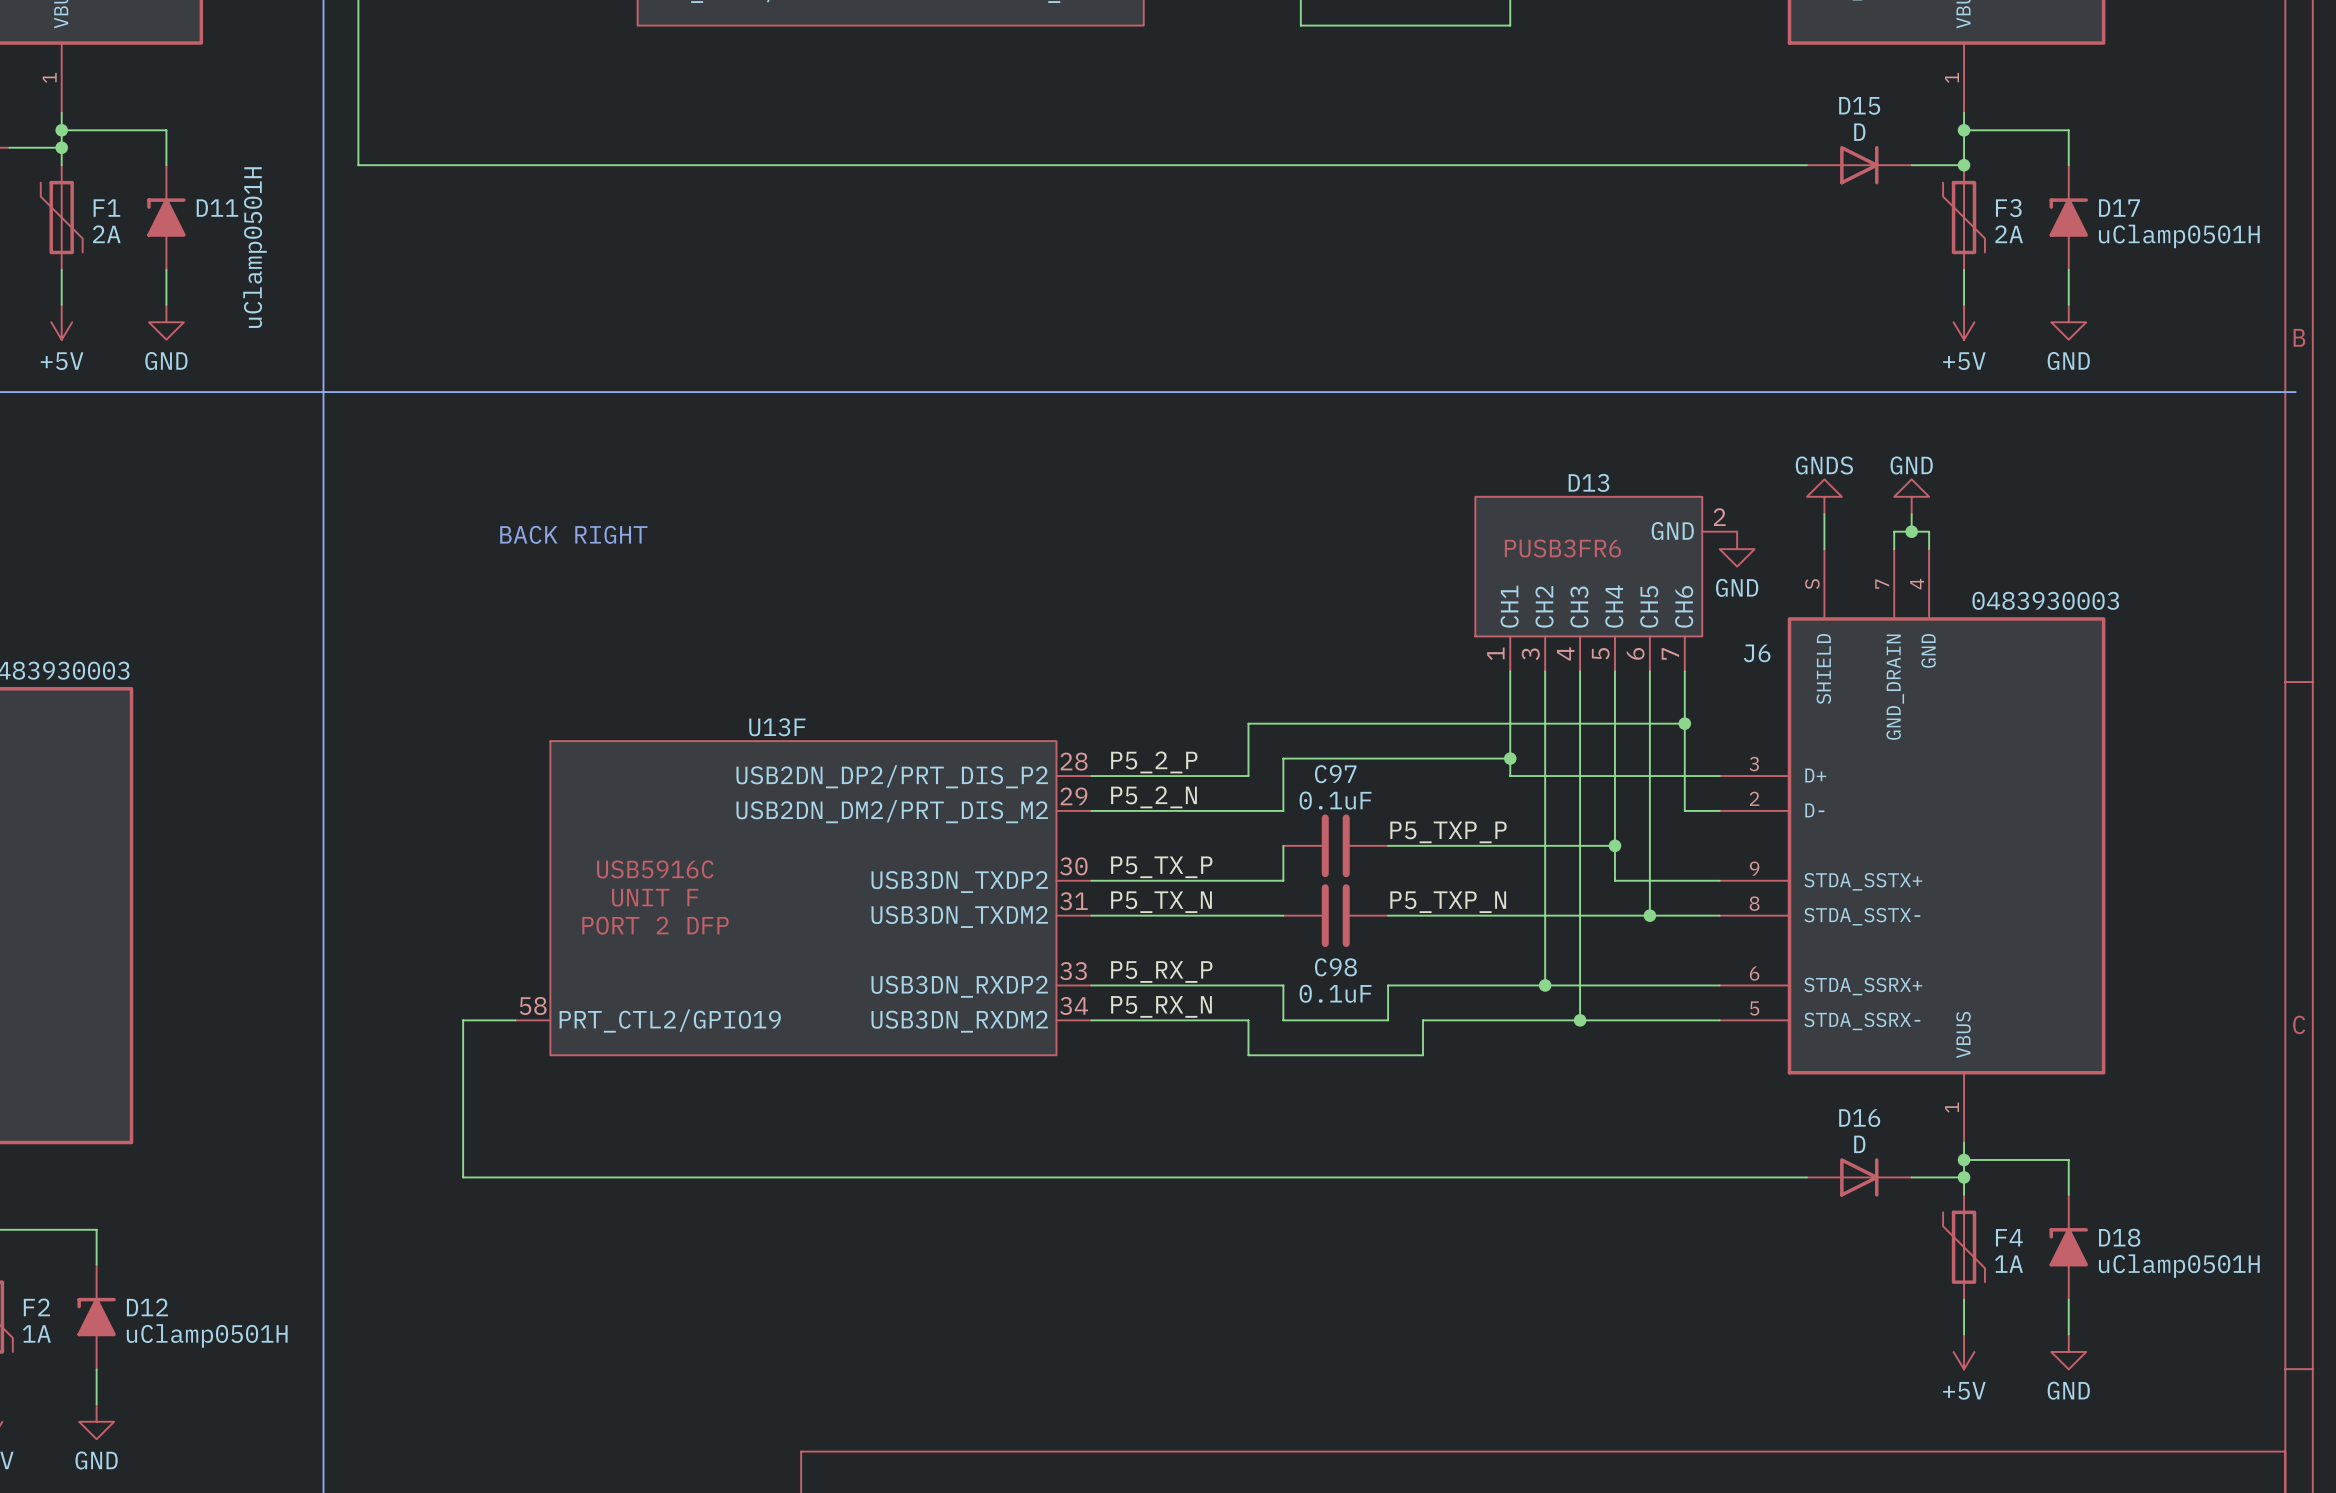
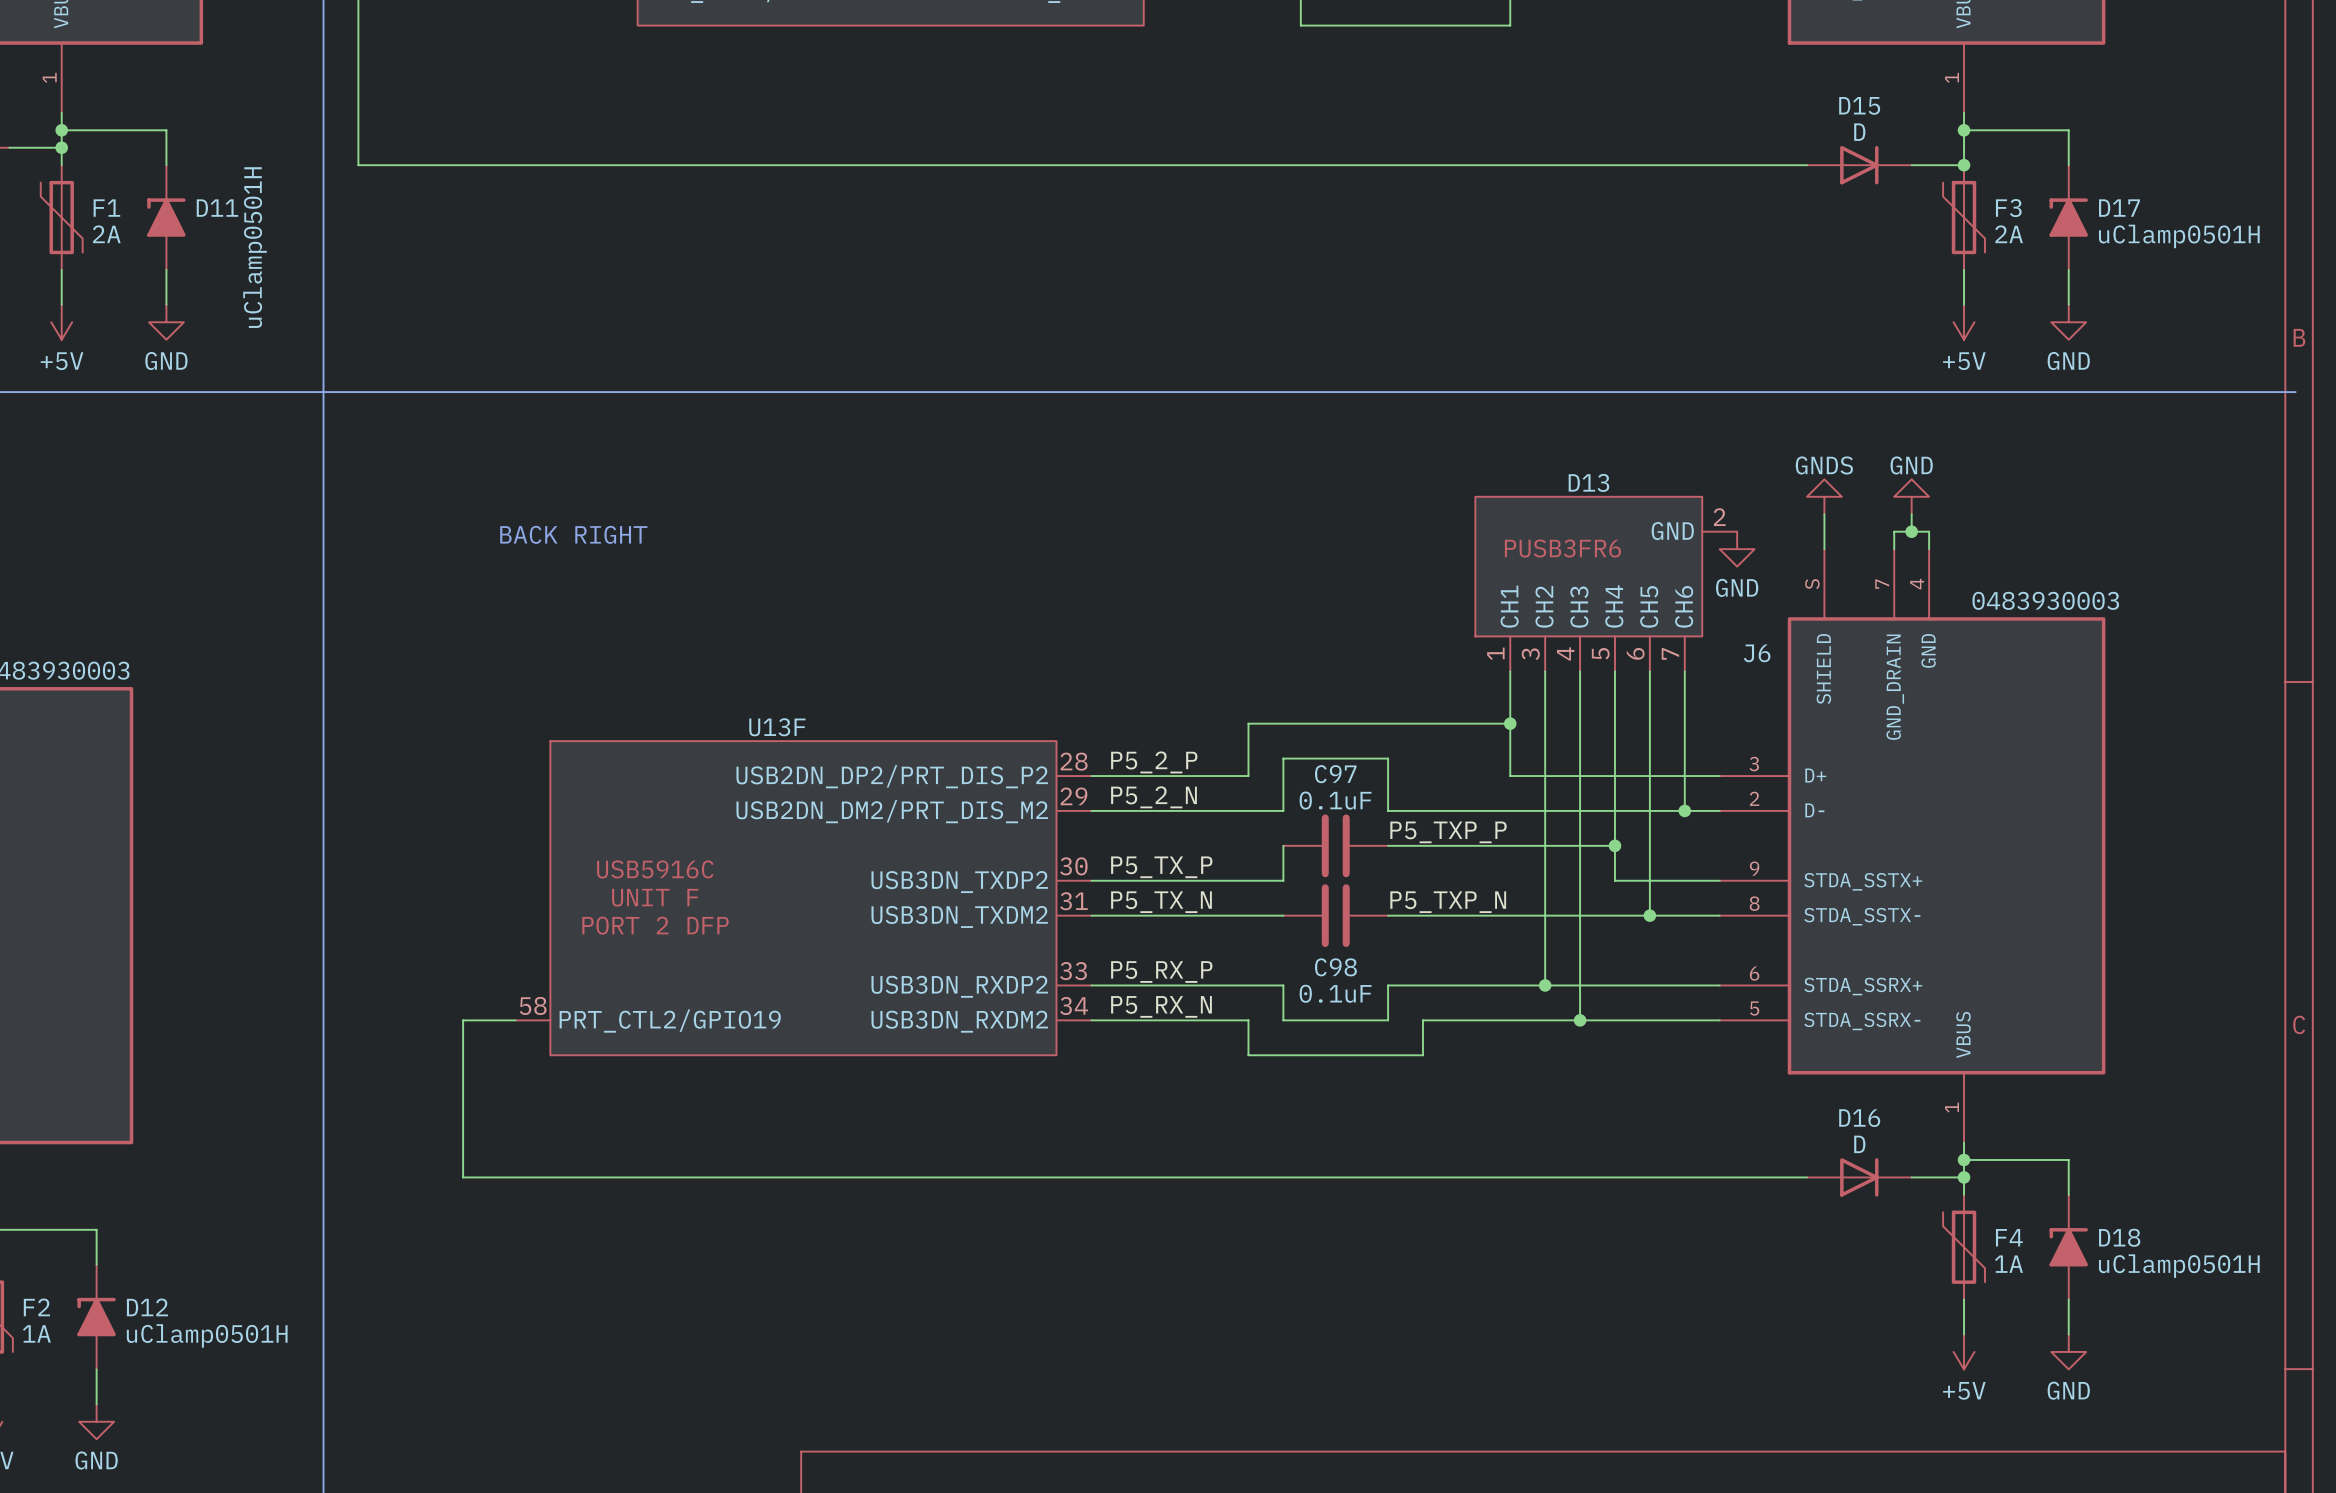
wire: (1510, 723) (1684, 723) -> none
junction: (1684, 723) -> none
wire: (1388, 758) (1510, 758) -> (1388, 758) (1388, 810) (1684, 810)
junction position: (1510, 758) -> (1510, 723)
junction: none -> (1684, 810)

